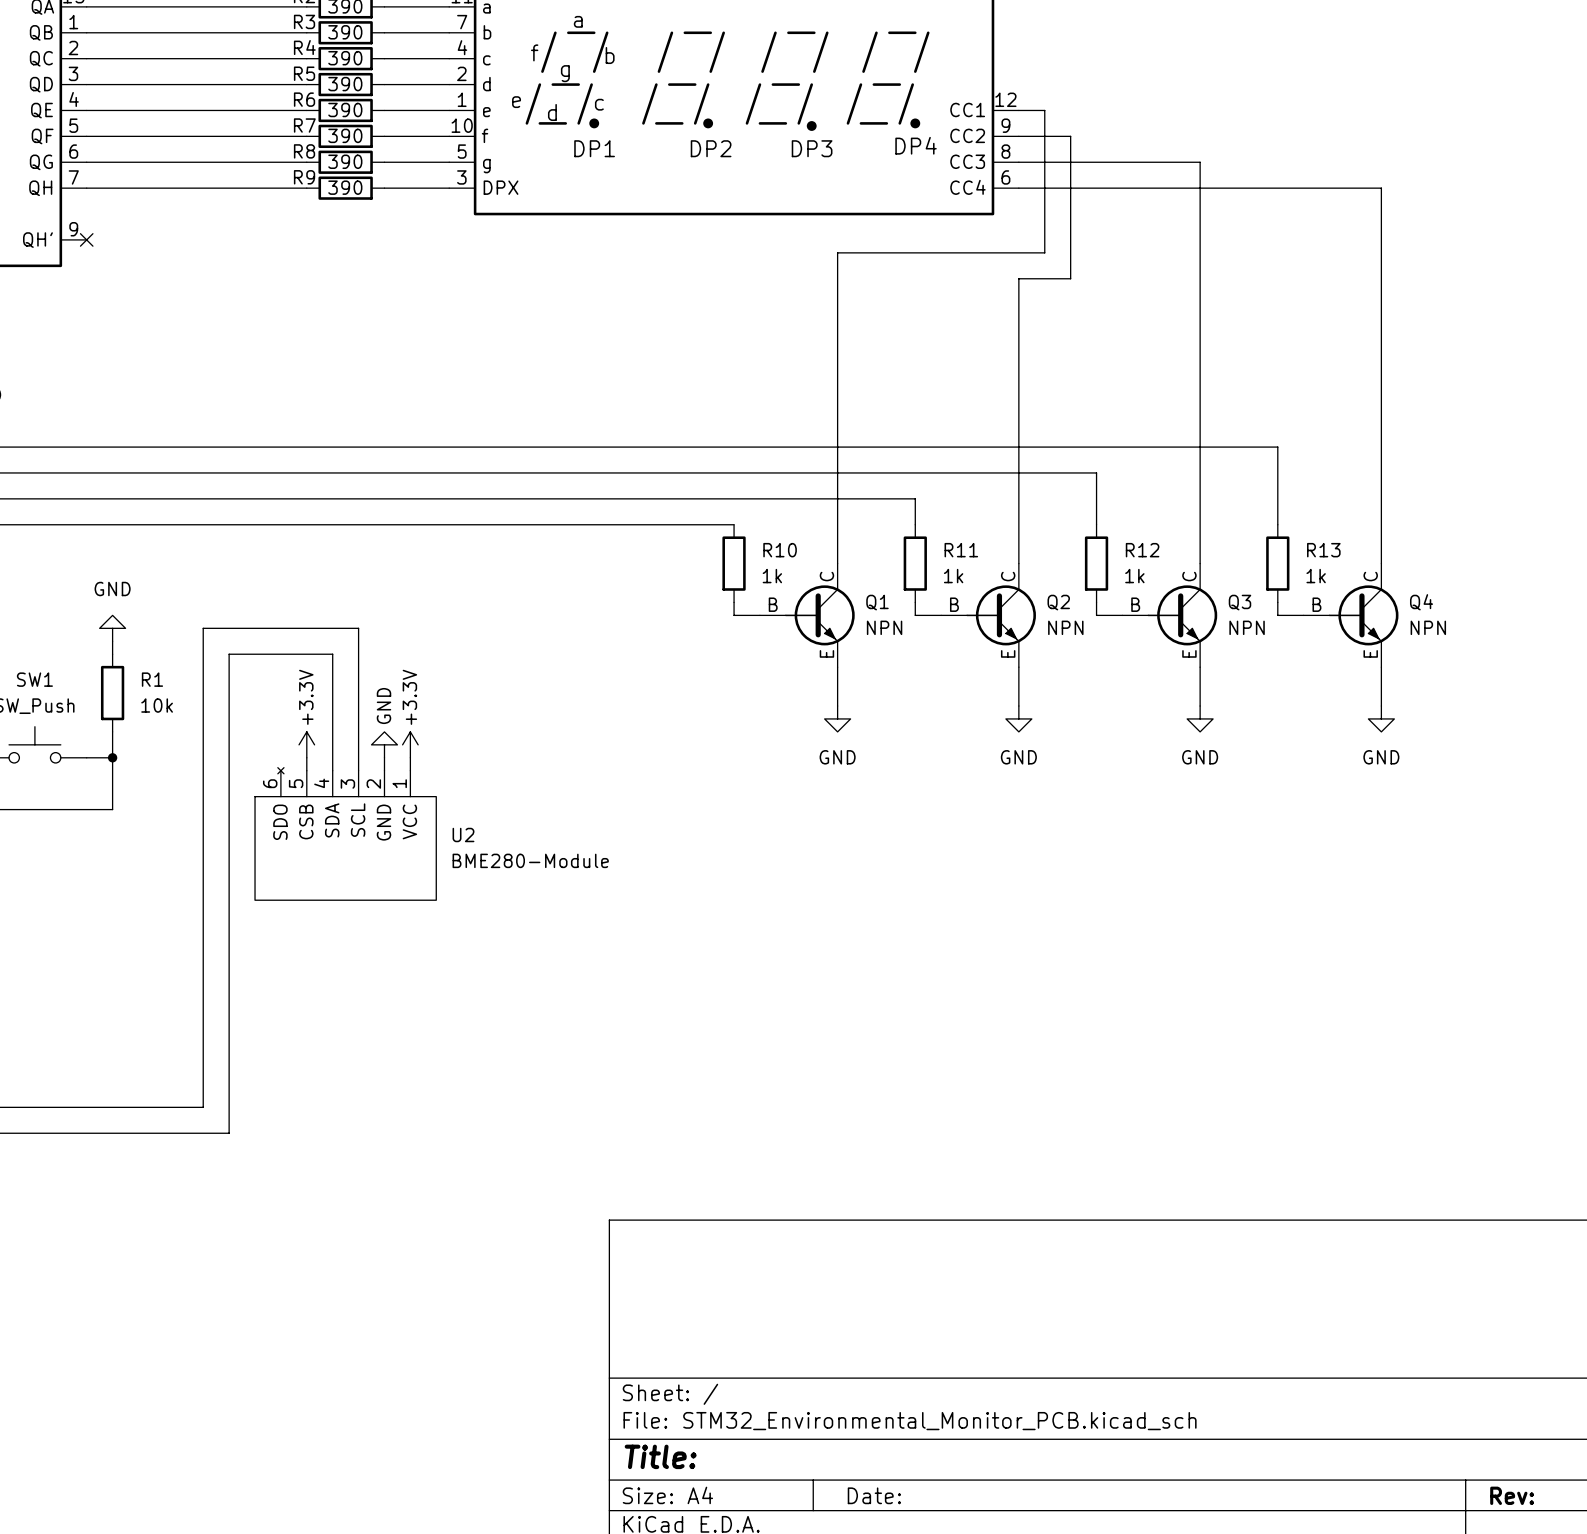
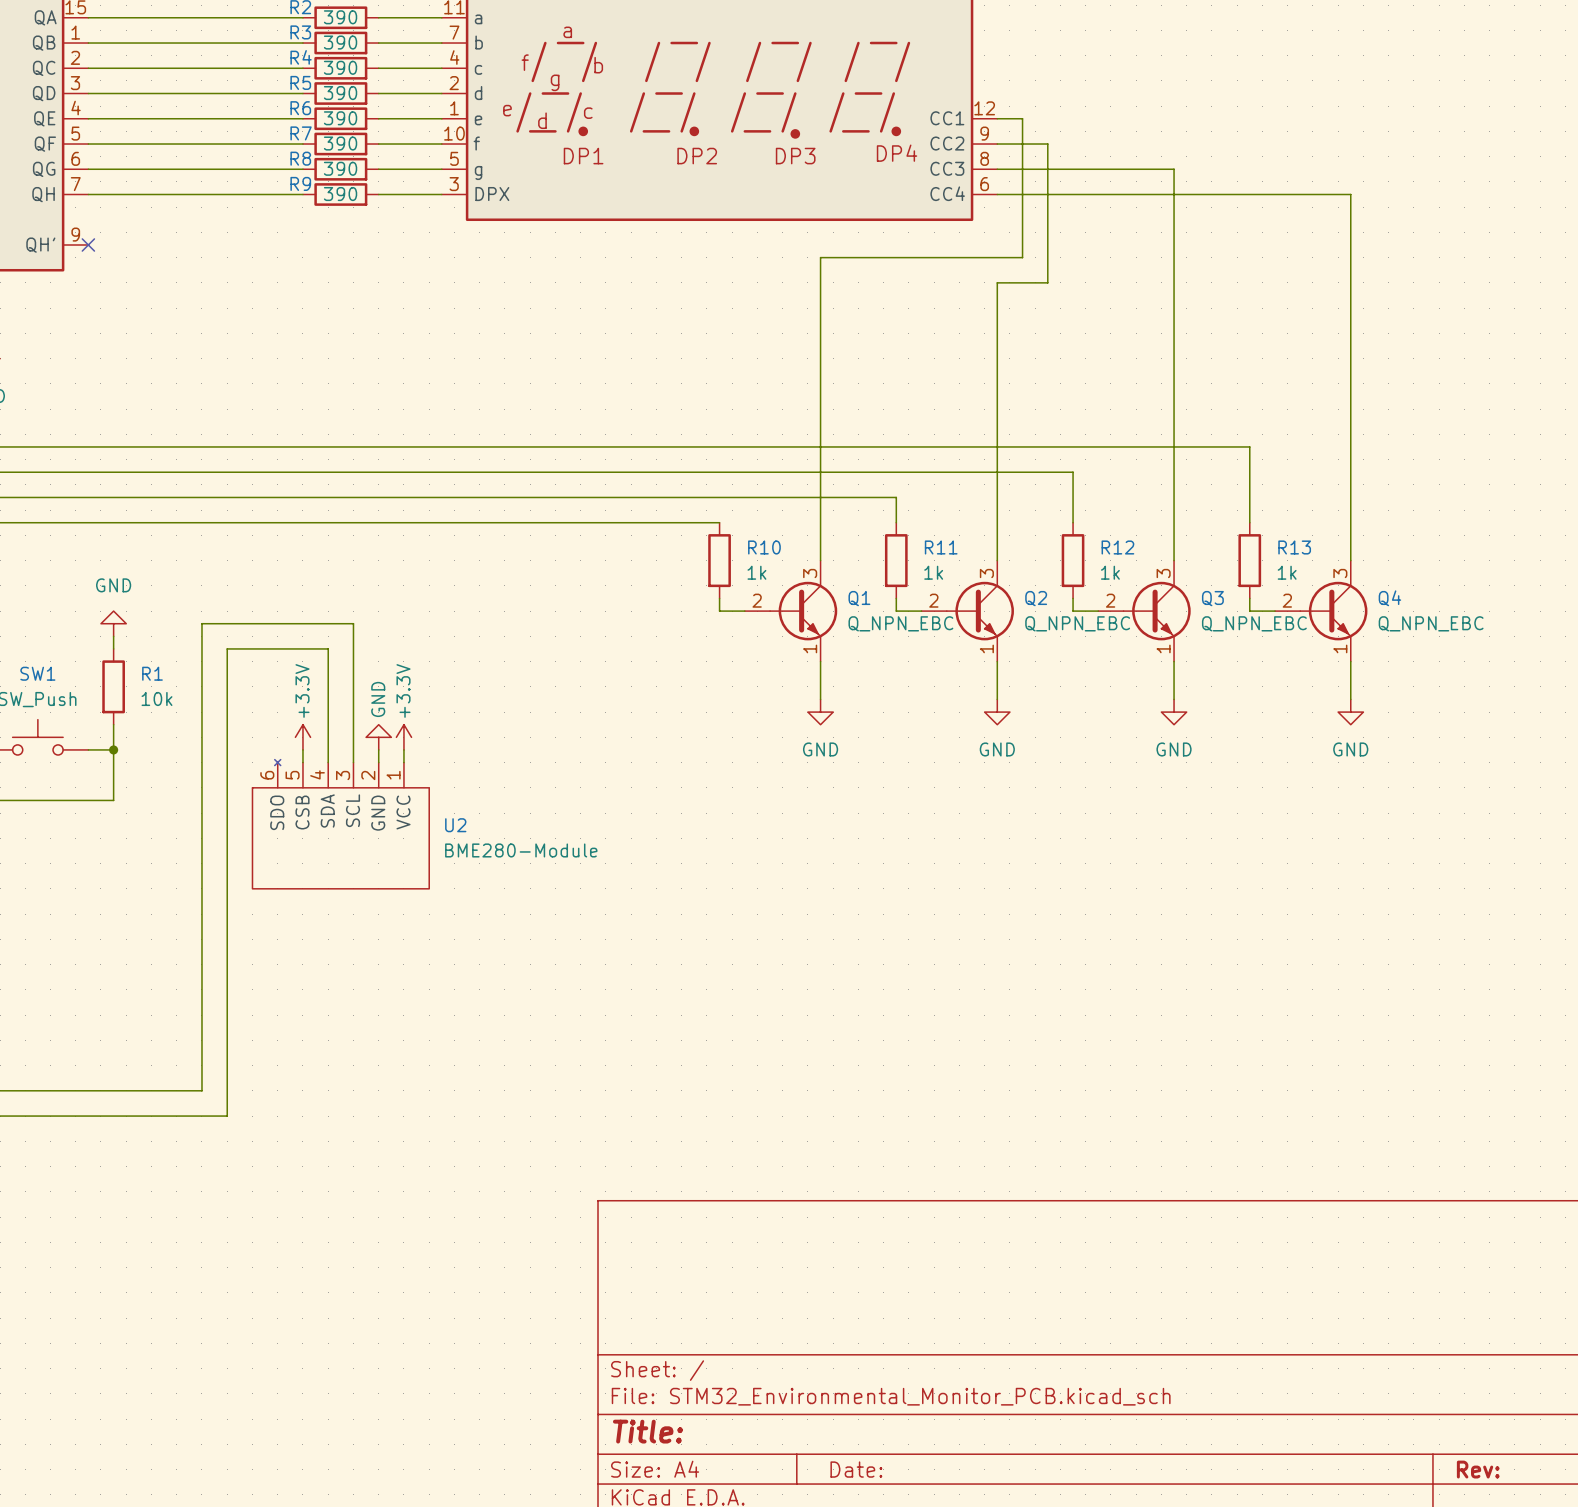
Q1 symbol: [759, 563, 855, 668] -> [744, 560, 838, 662]
Q2 symbol: [941, 563, 1036, 668] -> [921, 560, 1014, 662]
Q3 symbol: [1122, 563, 1218, 668] -> [1098, 560, 1191, 662]
Q4 symbol: [1303, 563, 1399, 668] -> [1275, 560, 1368, 662]
Q1 value: NPN (884, 627) -> Q_NPN_EBC (900, 623)
Q2 value: NPN (1065, 627) -> Q_NPN_EBC (1077, 623)
Q3 value: NPN (1247, 627) -> Q_NPN_EBC (1254, 623)
Q4 value: NPN (1428, 627) -> Q_NPN_EBC (1431, 623)

